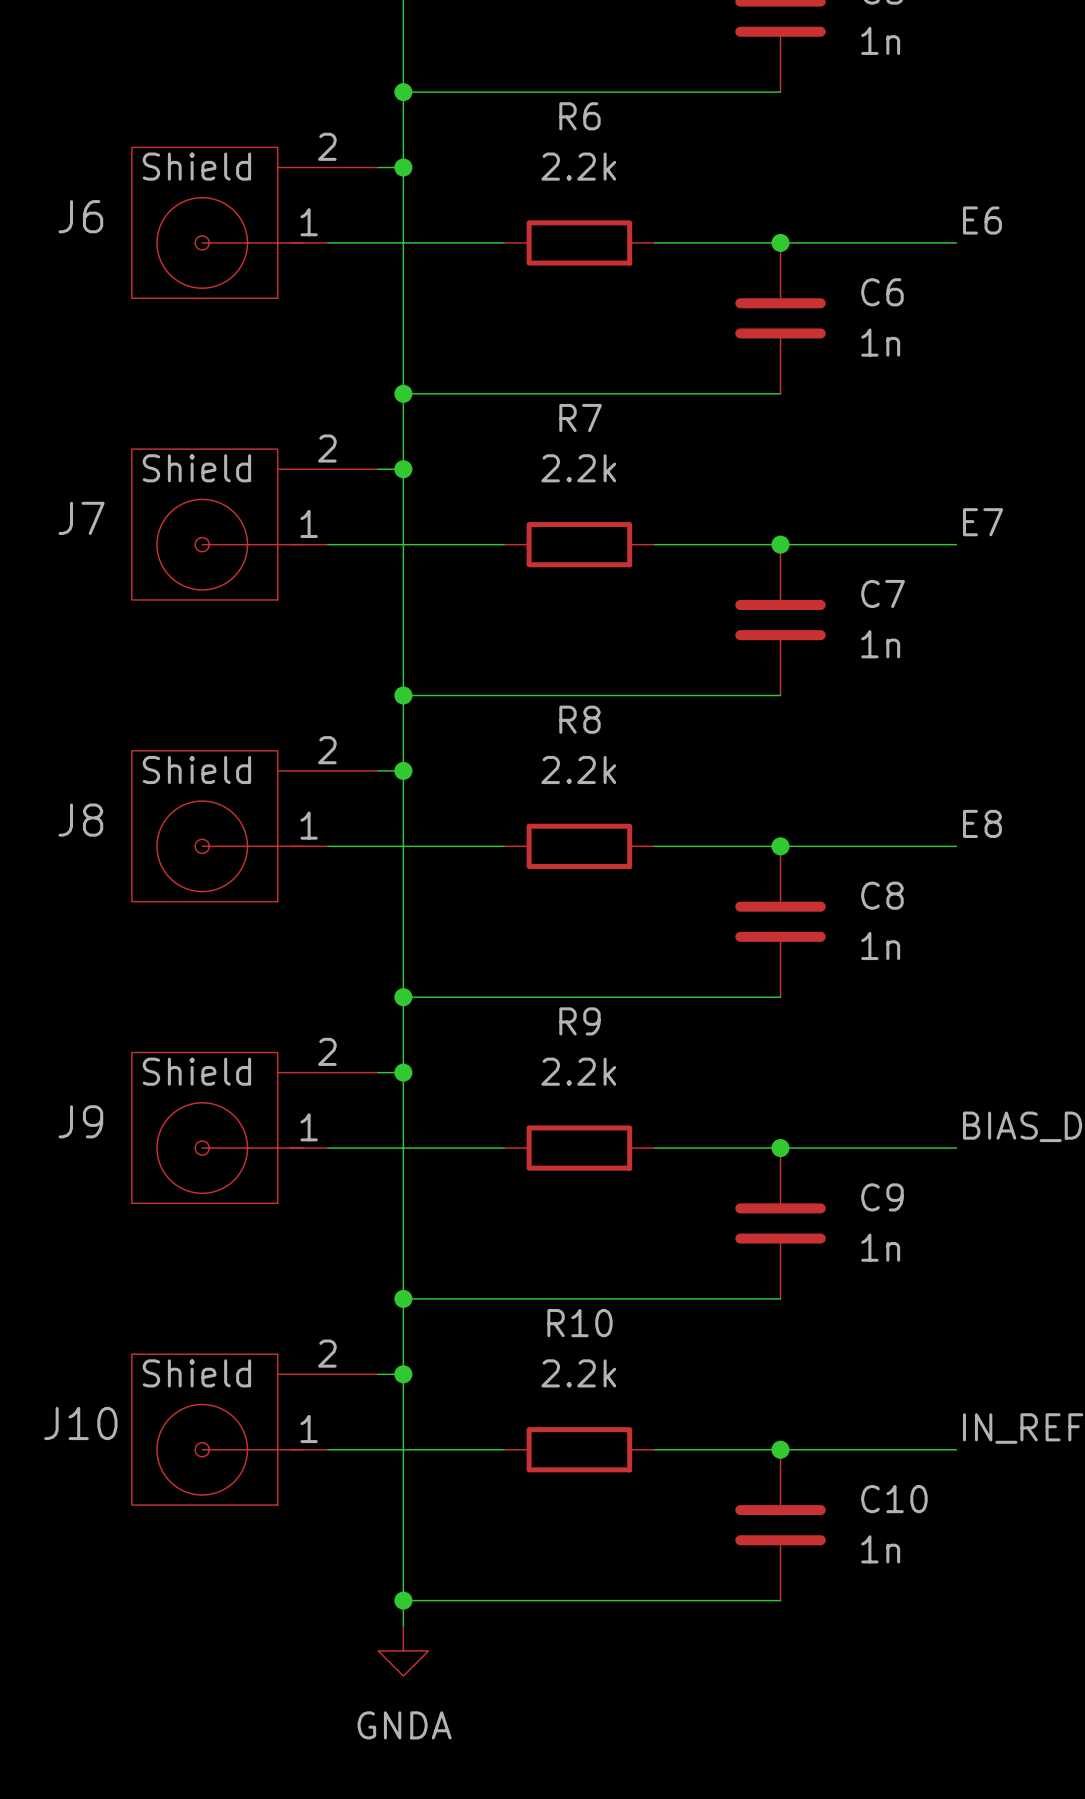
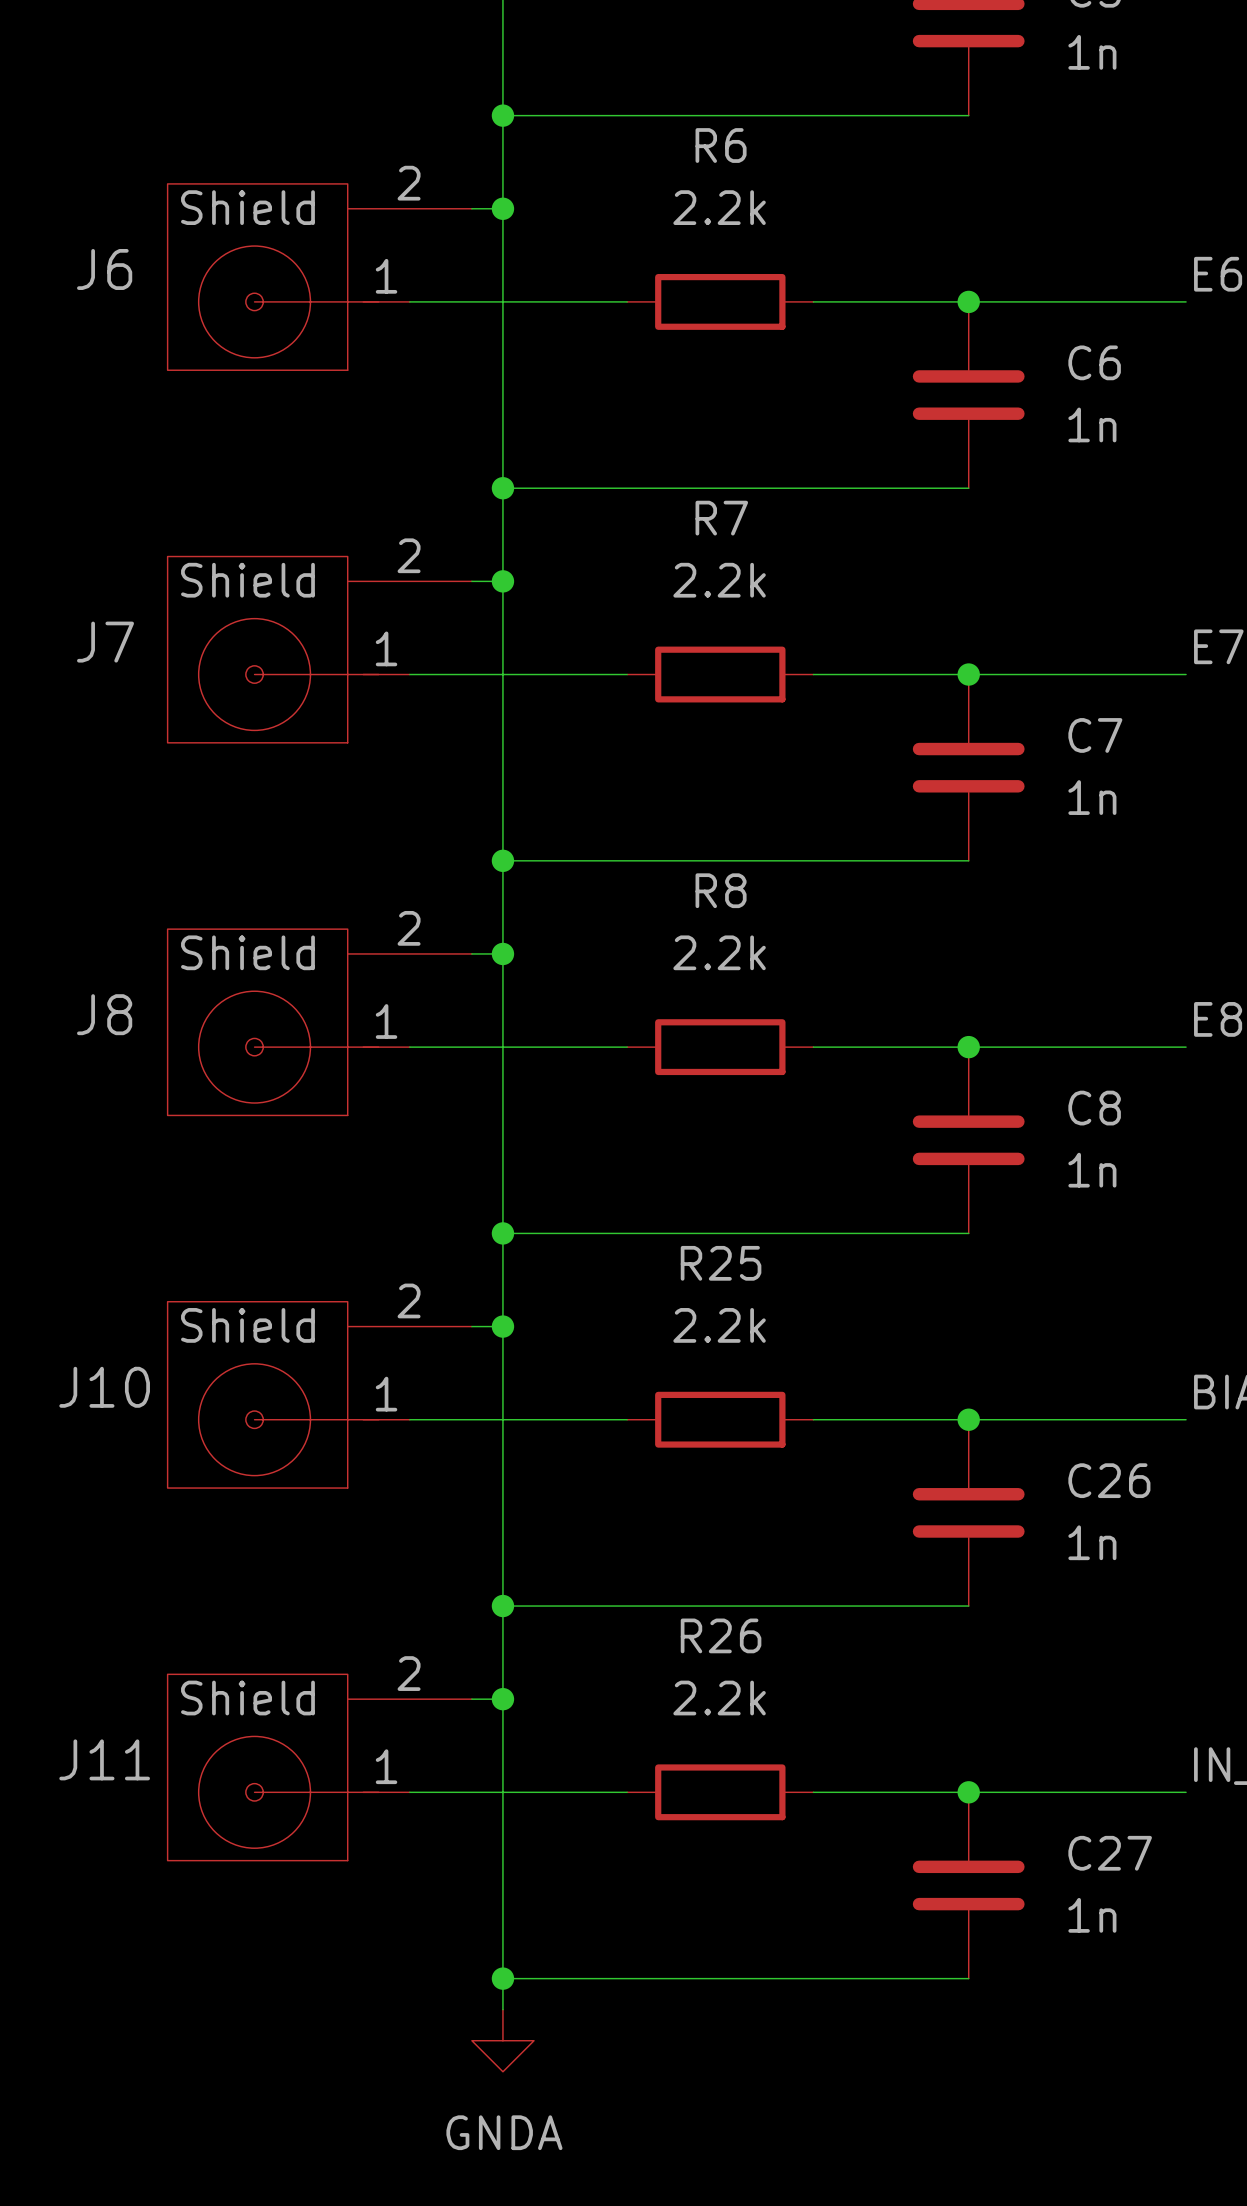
R9 name: R9 (579, 1021) -> R25 (721, 1263)
J9 name: J9 (80, 1121) -> J10 (104, 1387)
C9 name: C9 (882, 1197) -> C26 (1109, 1480)
R10 name: R10 (579, 1323) -> R26 (721, 1635)
J10 name: J10 (80, 1423) -> J11 (104, 1759)
C10 name: C10 (894, 1499) -> C27 (1110, 1853)

